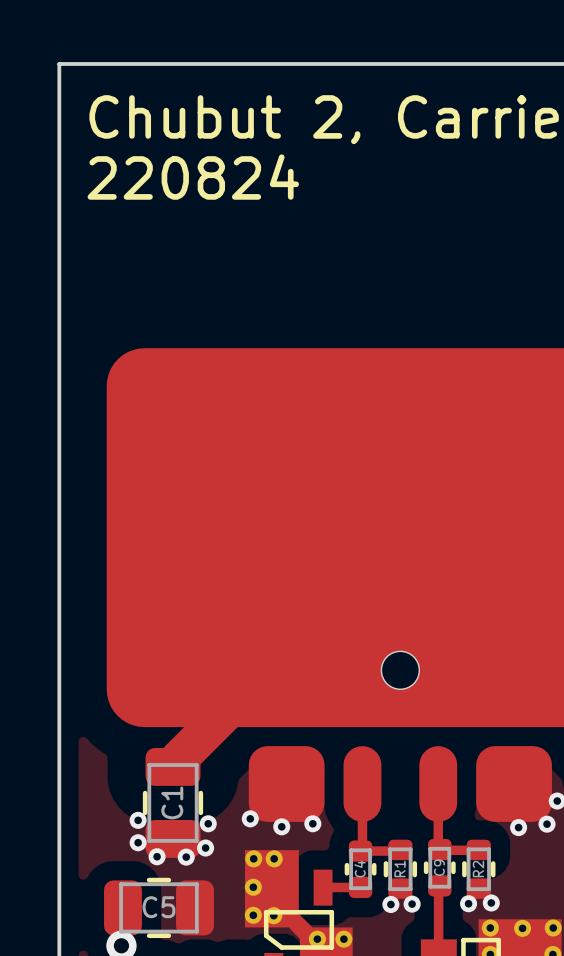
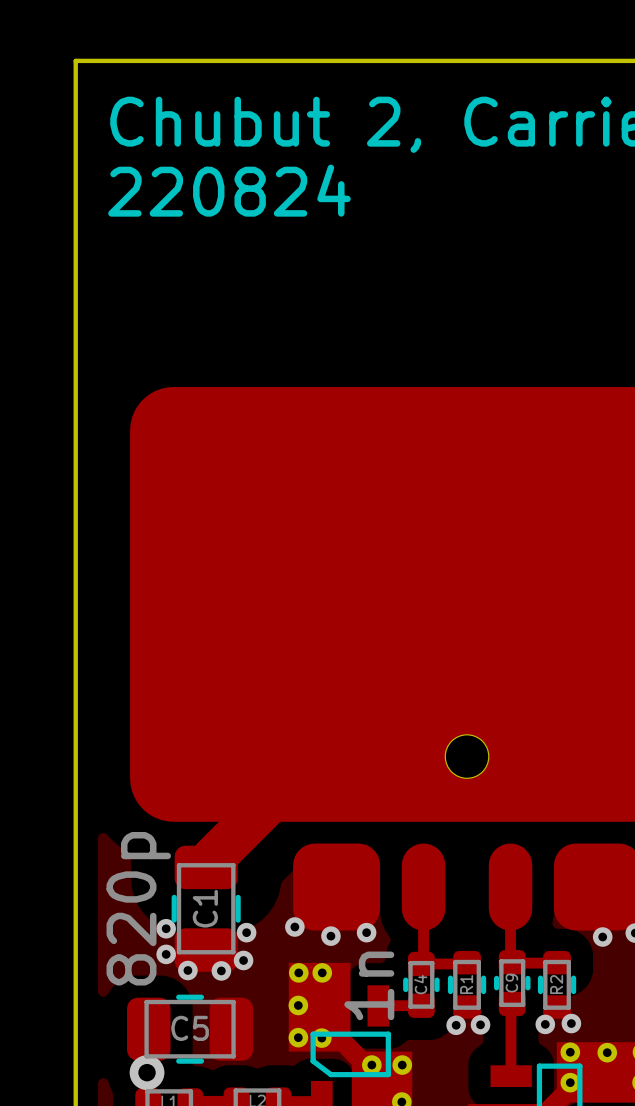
C1 value: none -> 820p (138, 908)
C4 value: none -> 1n (369, 985)

